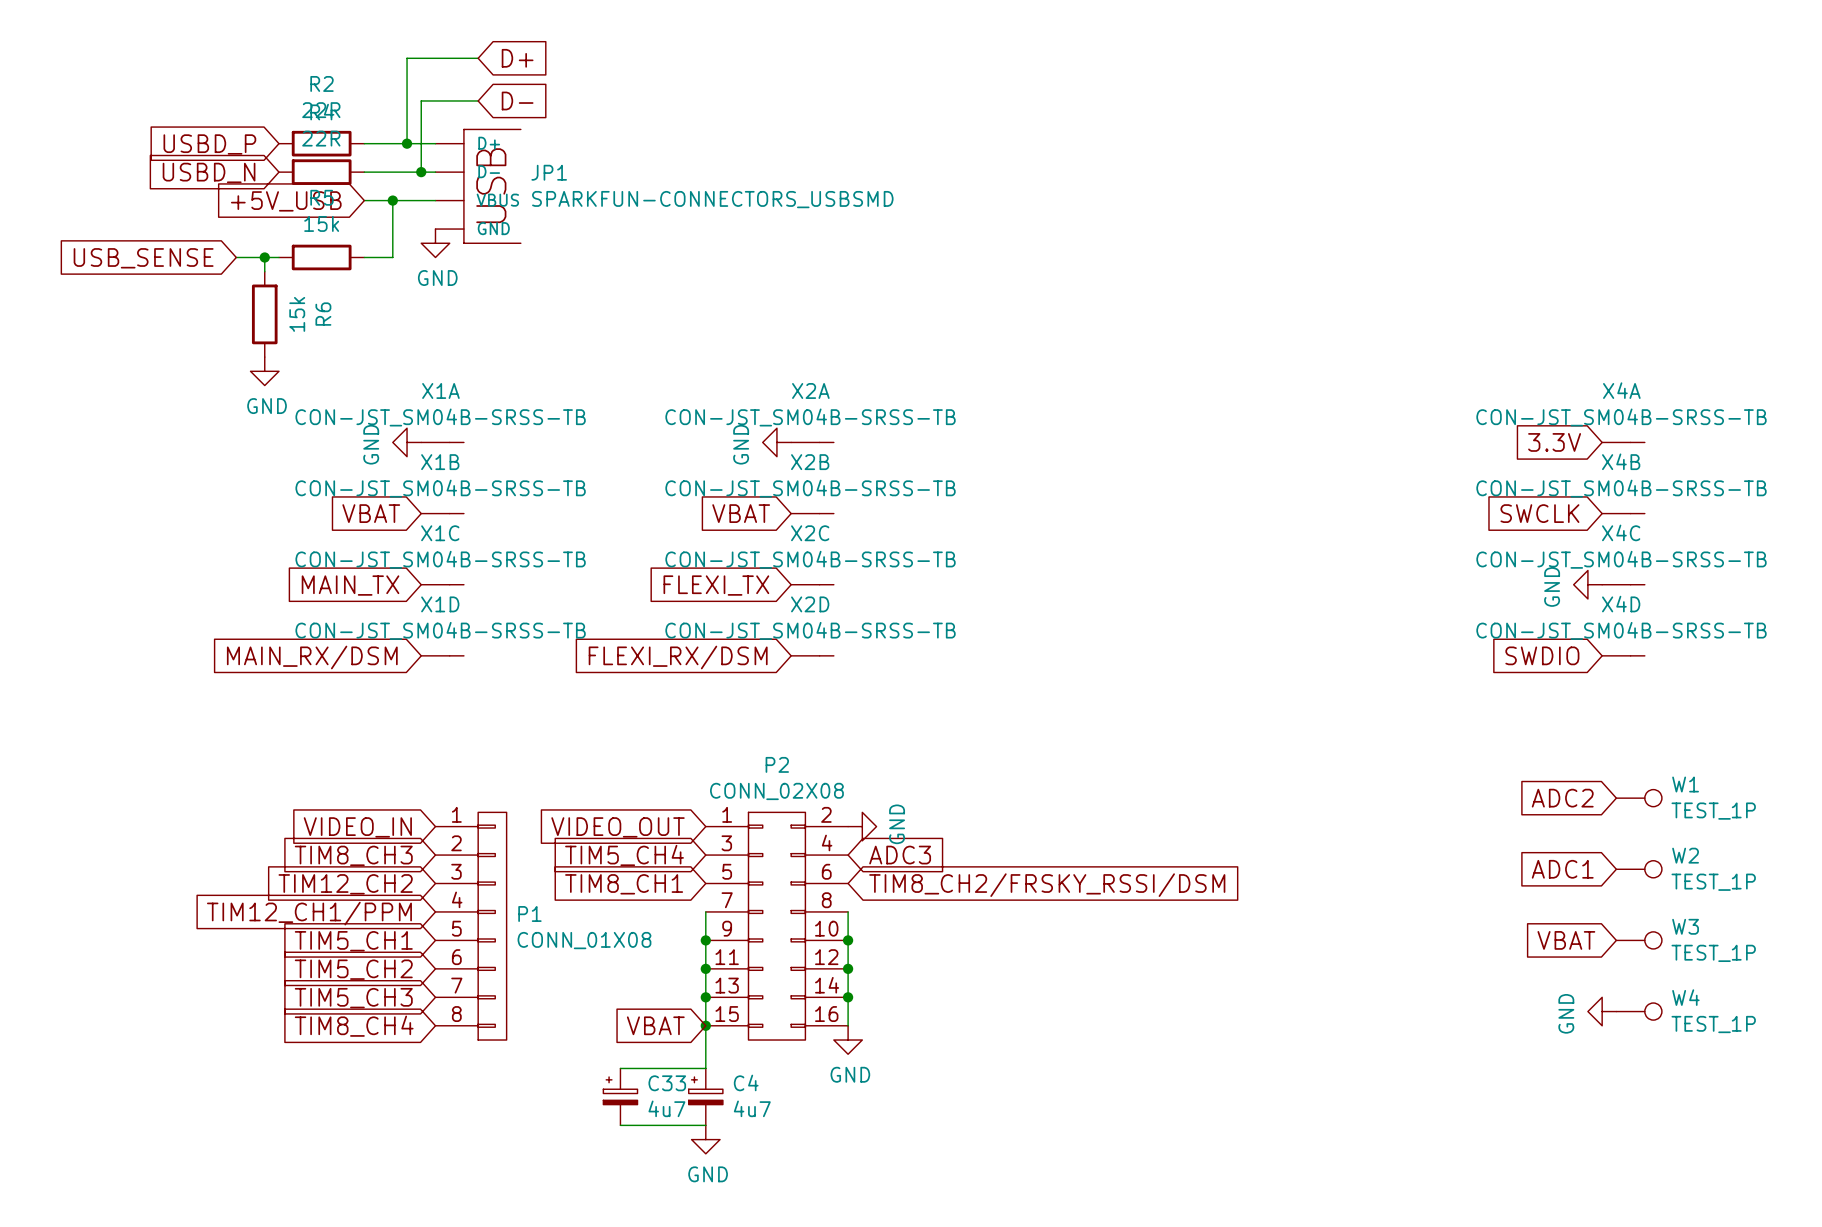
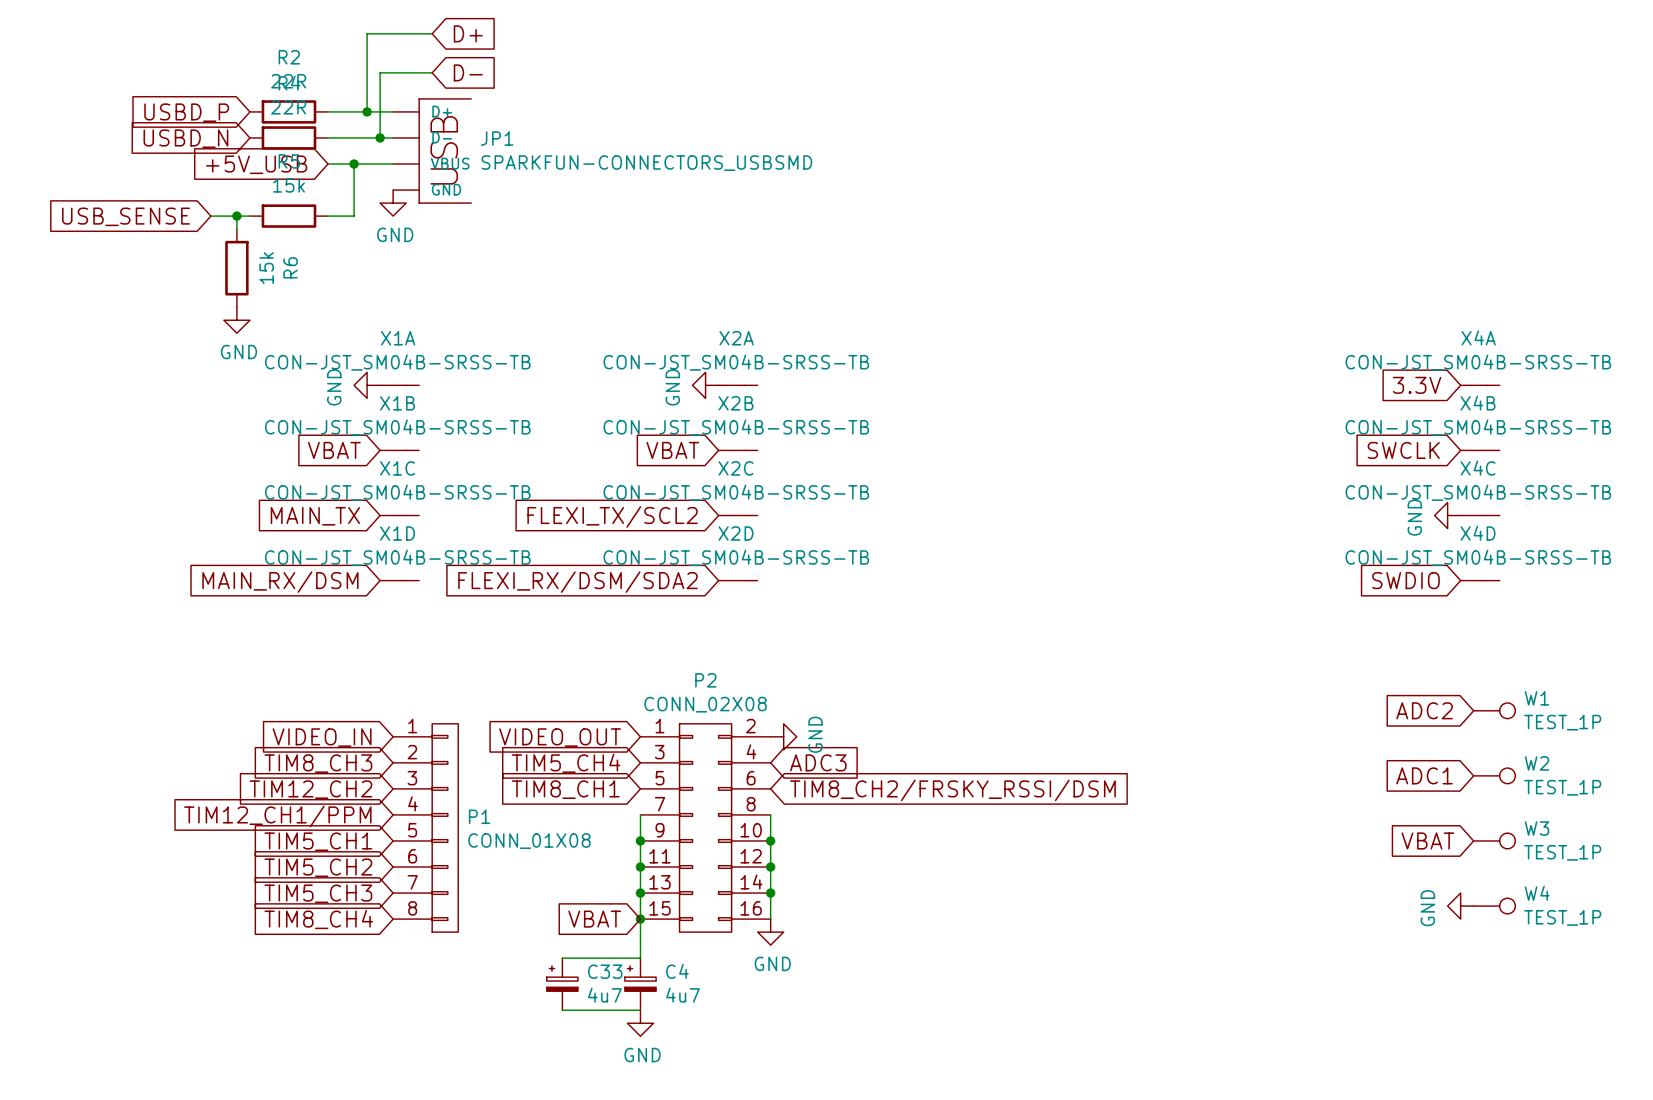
global label: FLEXI_TX (716, 585) -> FLEXI_TX/SCL2 (612, 517)
global label: FLEXI_RX/DSM (678, 657) -> FLEXI_RX/DSM/SDA2 (577, 582)

